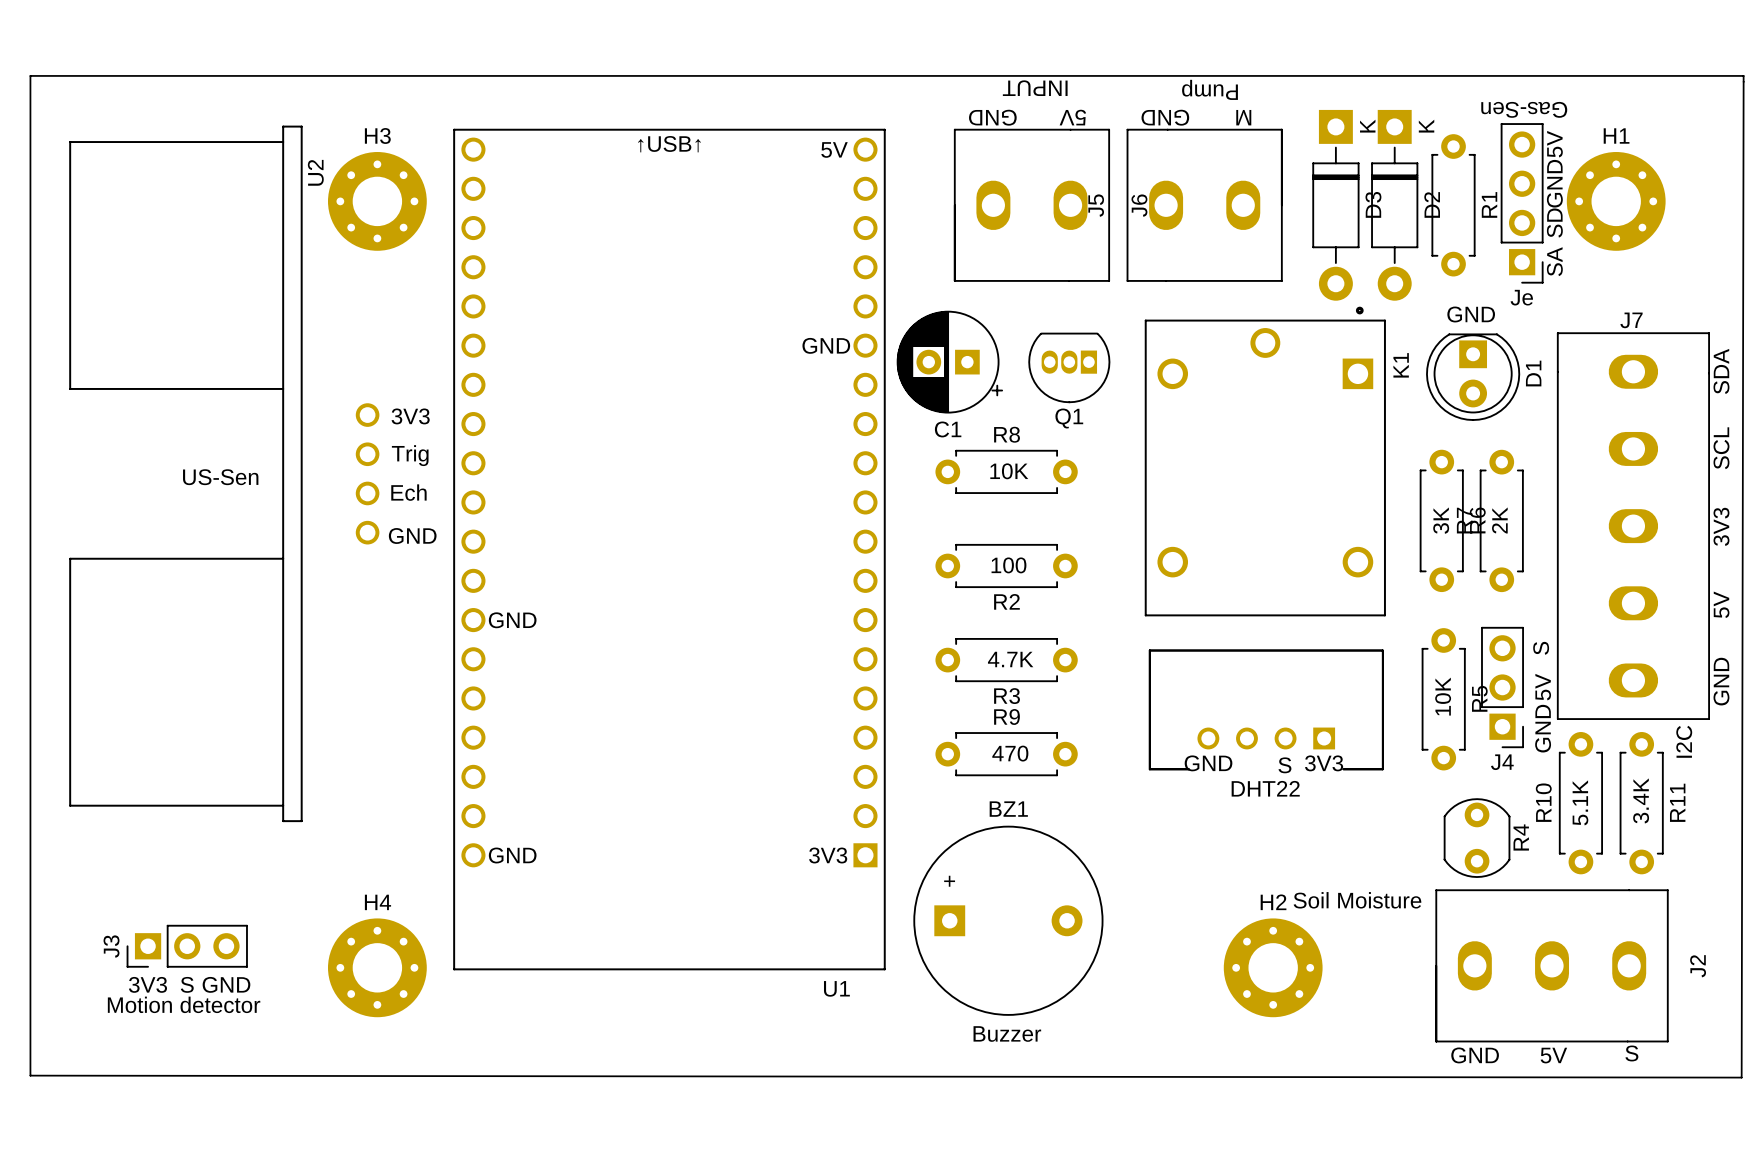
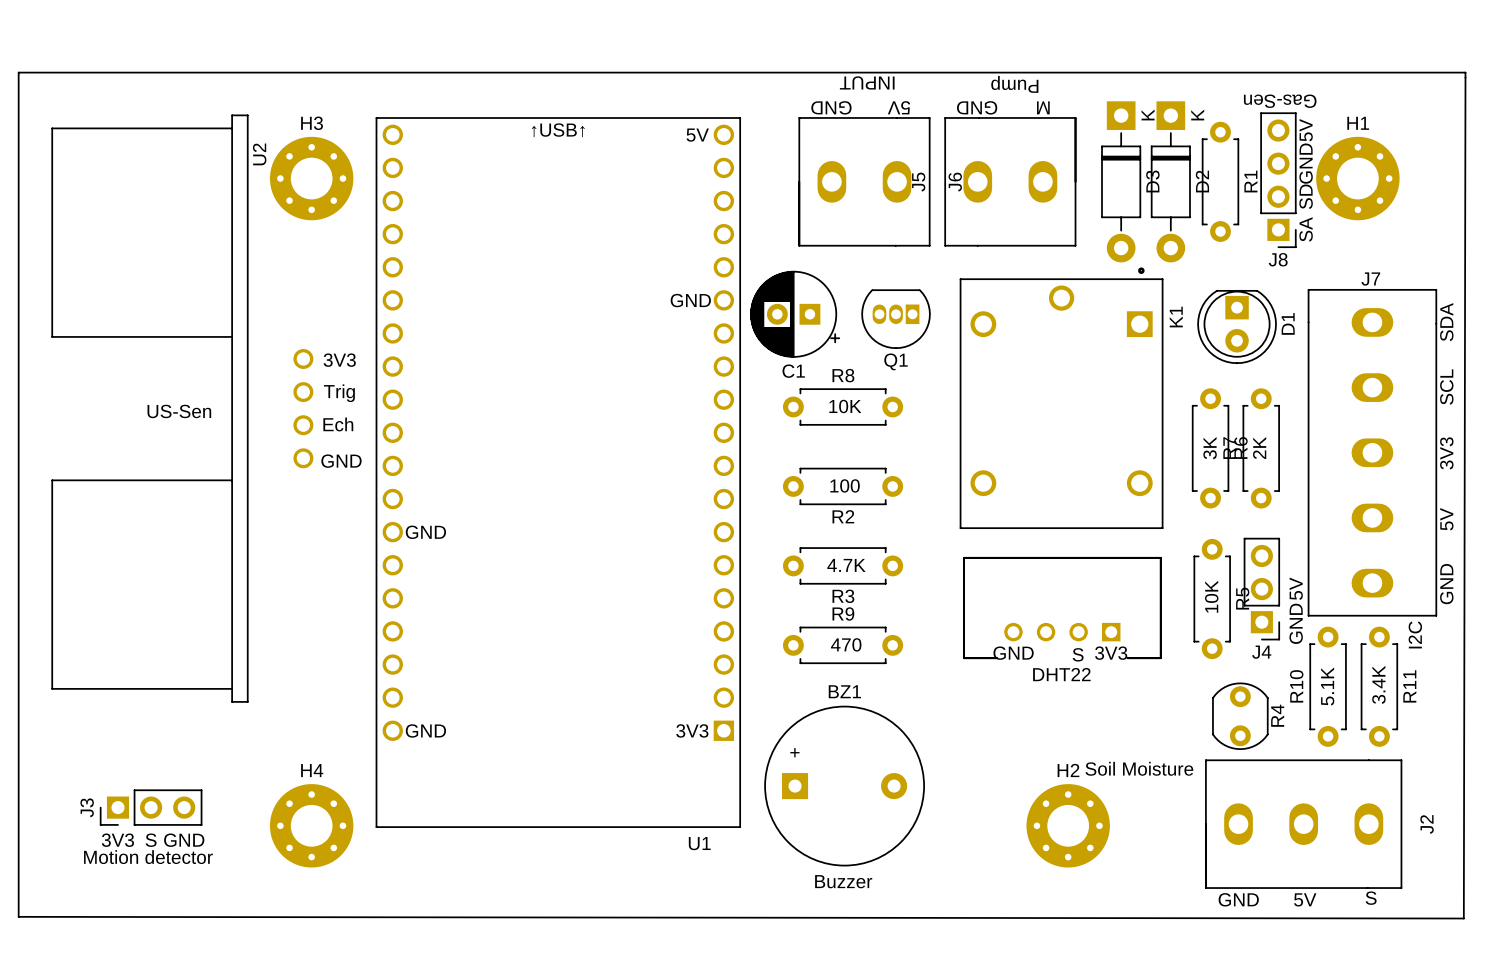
Je name: Je (1521, 297) -> J8 (1278, 259)
text: GND (1471, 314) -> none
text: S (1541, 648) -> none

